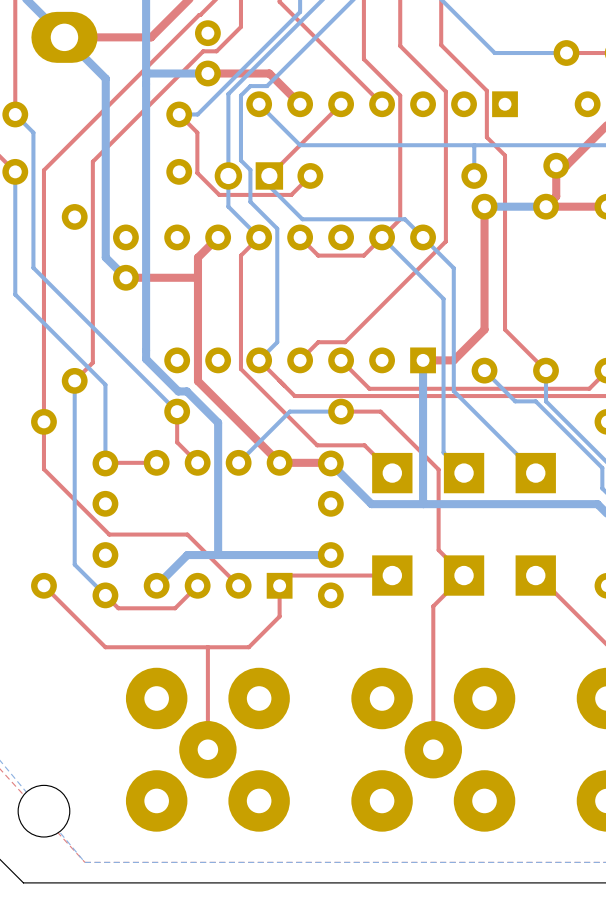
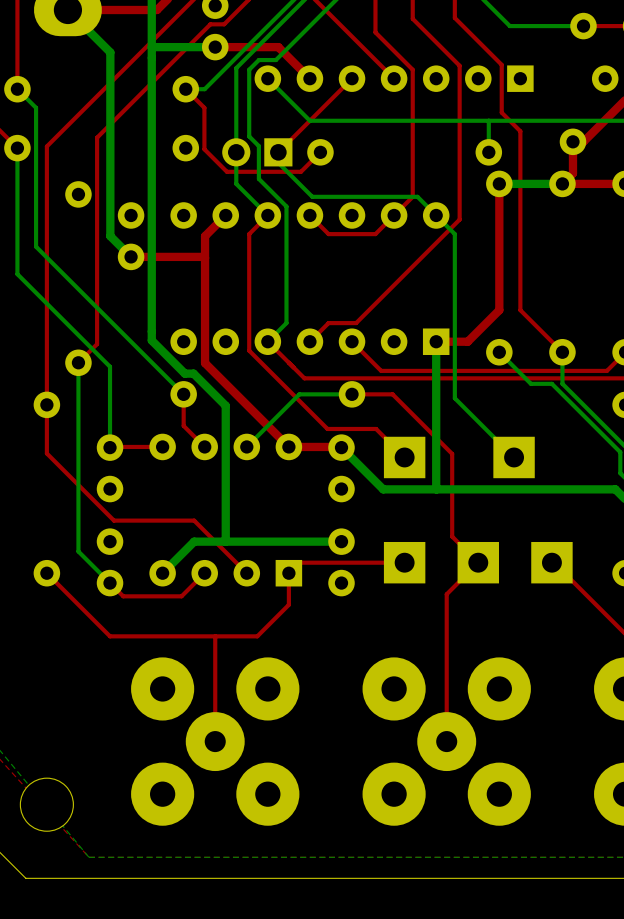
bottom track: (382, 237) (443, 298) (443, 452) (464, 473) -> none
bottom track: (441, 255) (453, 268) (453, 391) (535, 473) -> (454, 234) (454, 398) (514, 457)
part: (464, 473) -> none
part: none -> (514, 457)
part: (535, 473) -> none

